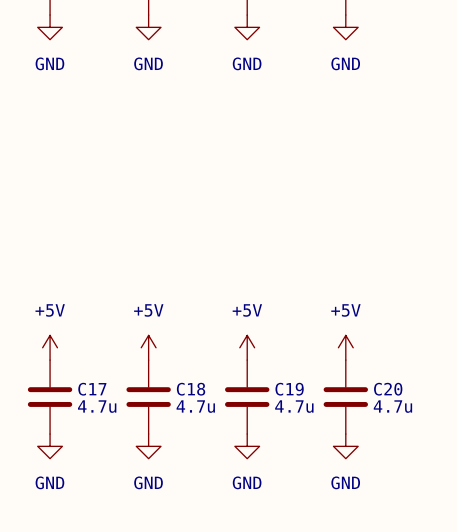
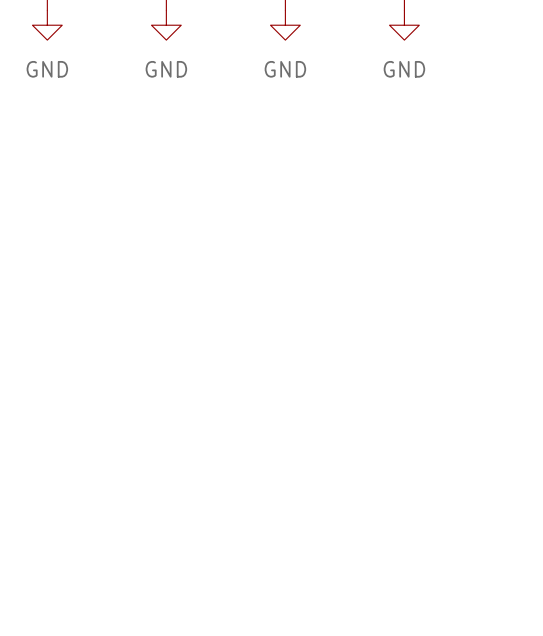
power symbol: +5V (50, 347) -> none
power symbol: +5V (148, 347) -> none
power symbol: +5V (247, 347) -> none
power symbol: +5V (345, 347) -> none
C17: 4.7u (50, 397) -> none
C18: 4.7u (148, 397) -> none
C19: 4.7u (247, 397) -> none
C20: 4.7u (345, 397) -> none
power symbol: GND (50, 446) -> none
power symbol: GND (148, 446) -> none
power symbol: GND (247, 446) -> none
power symbol: GND (345, 446) -> none

